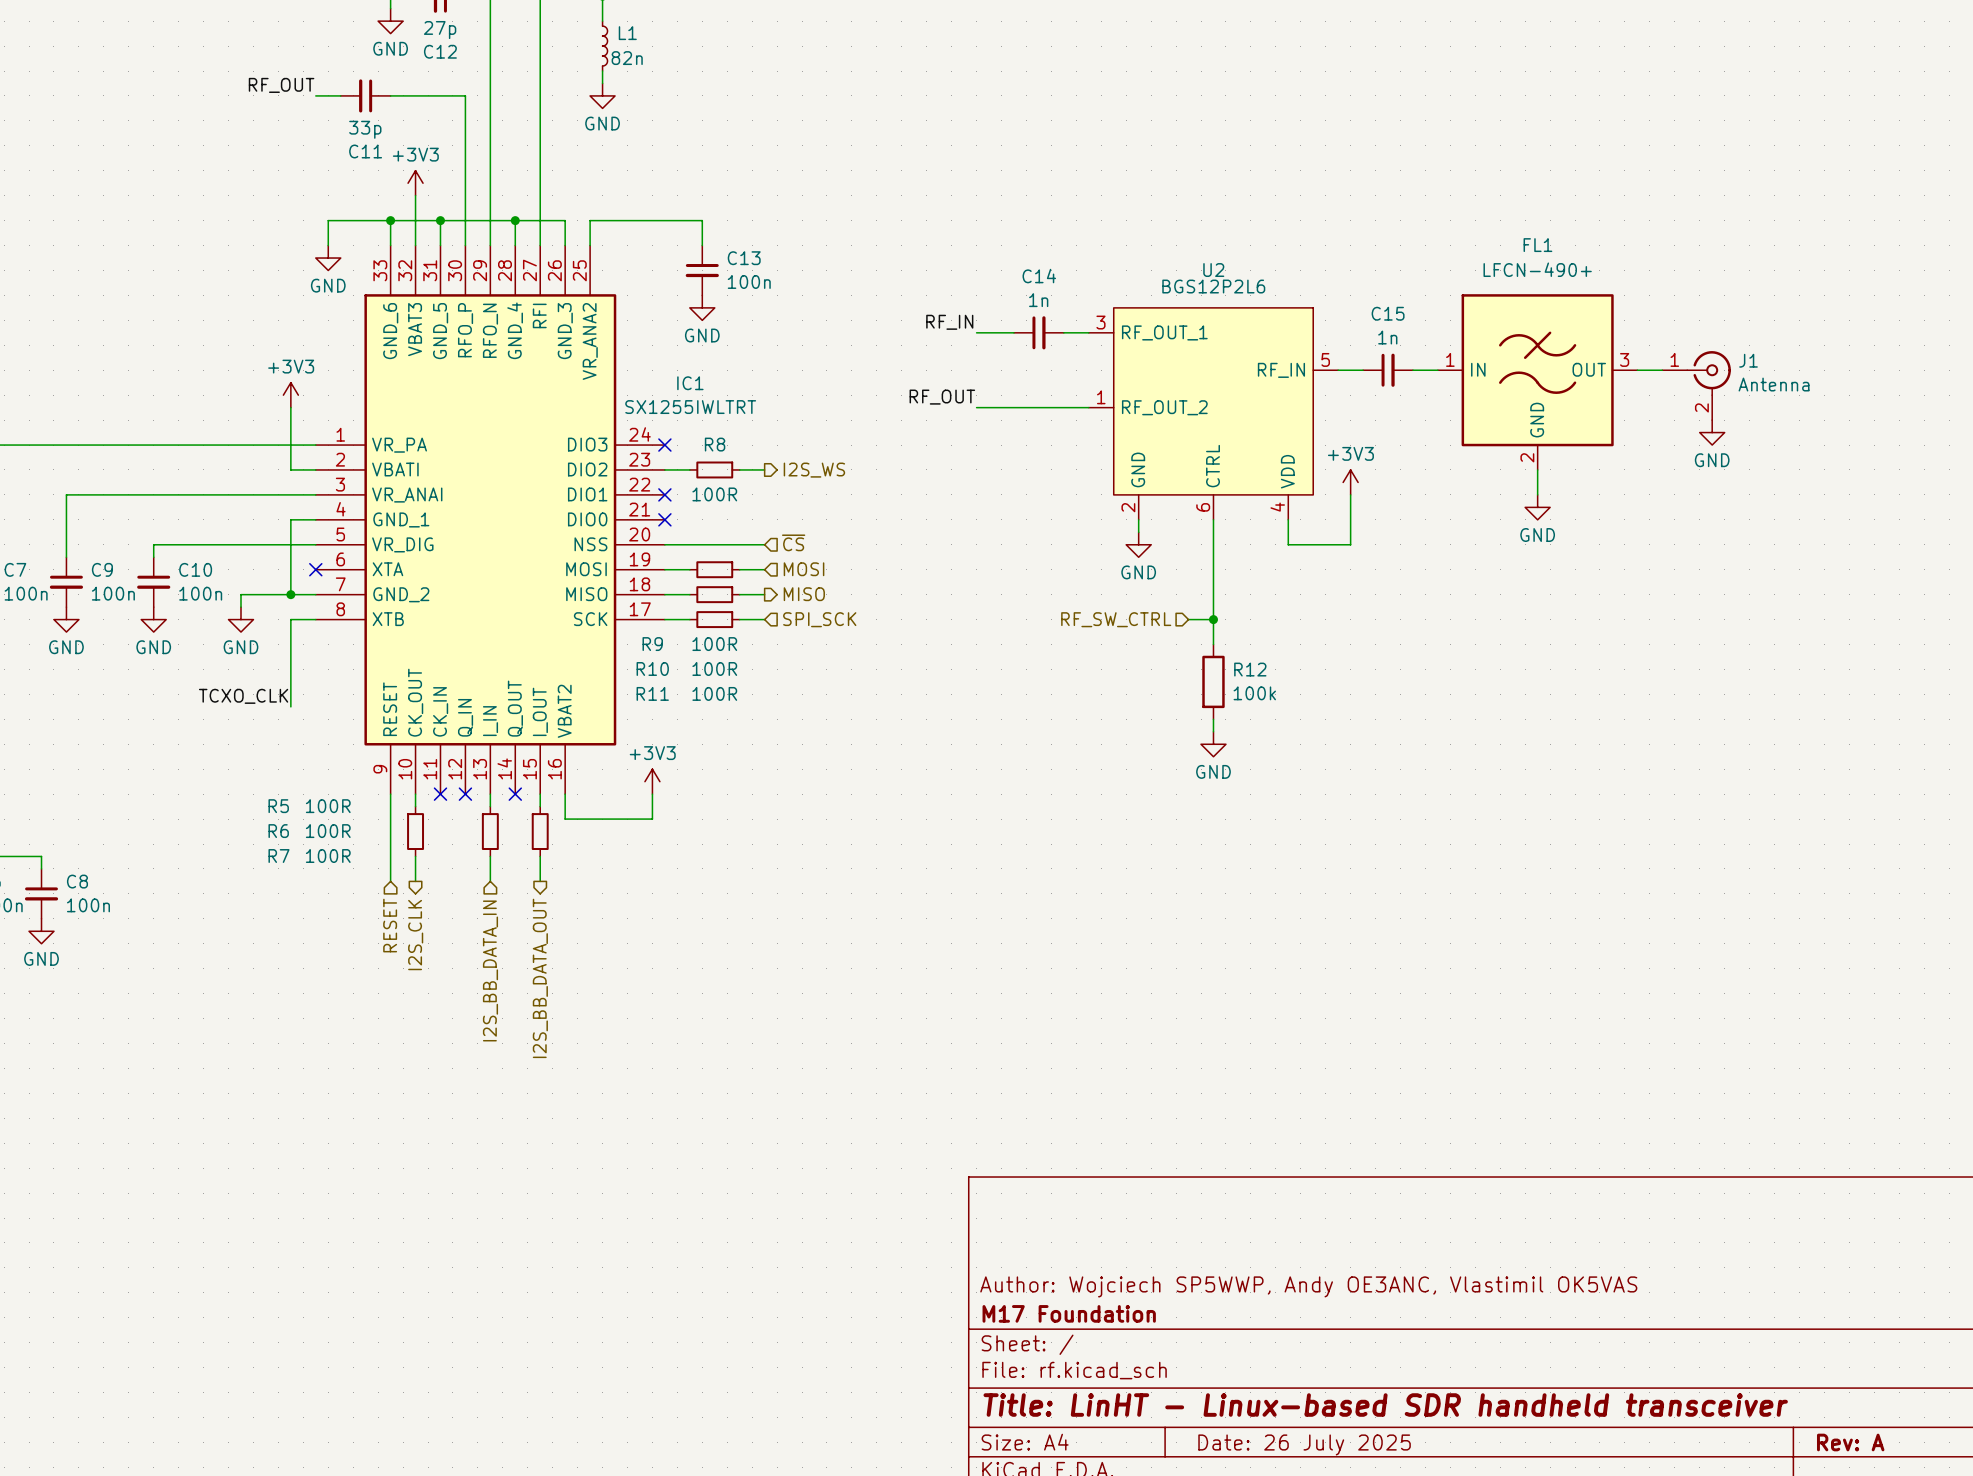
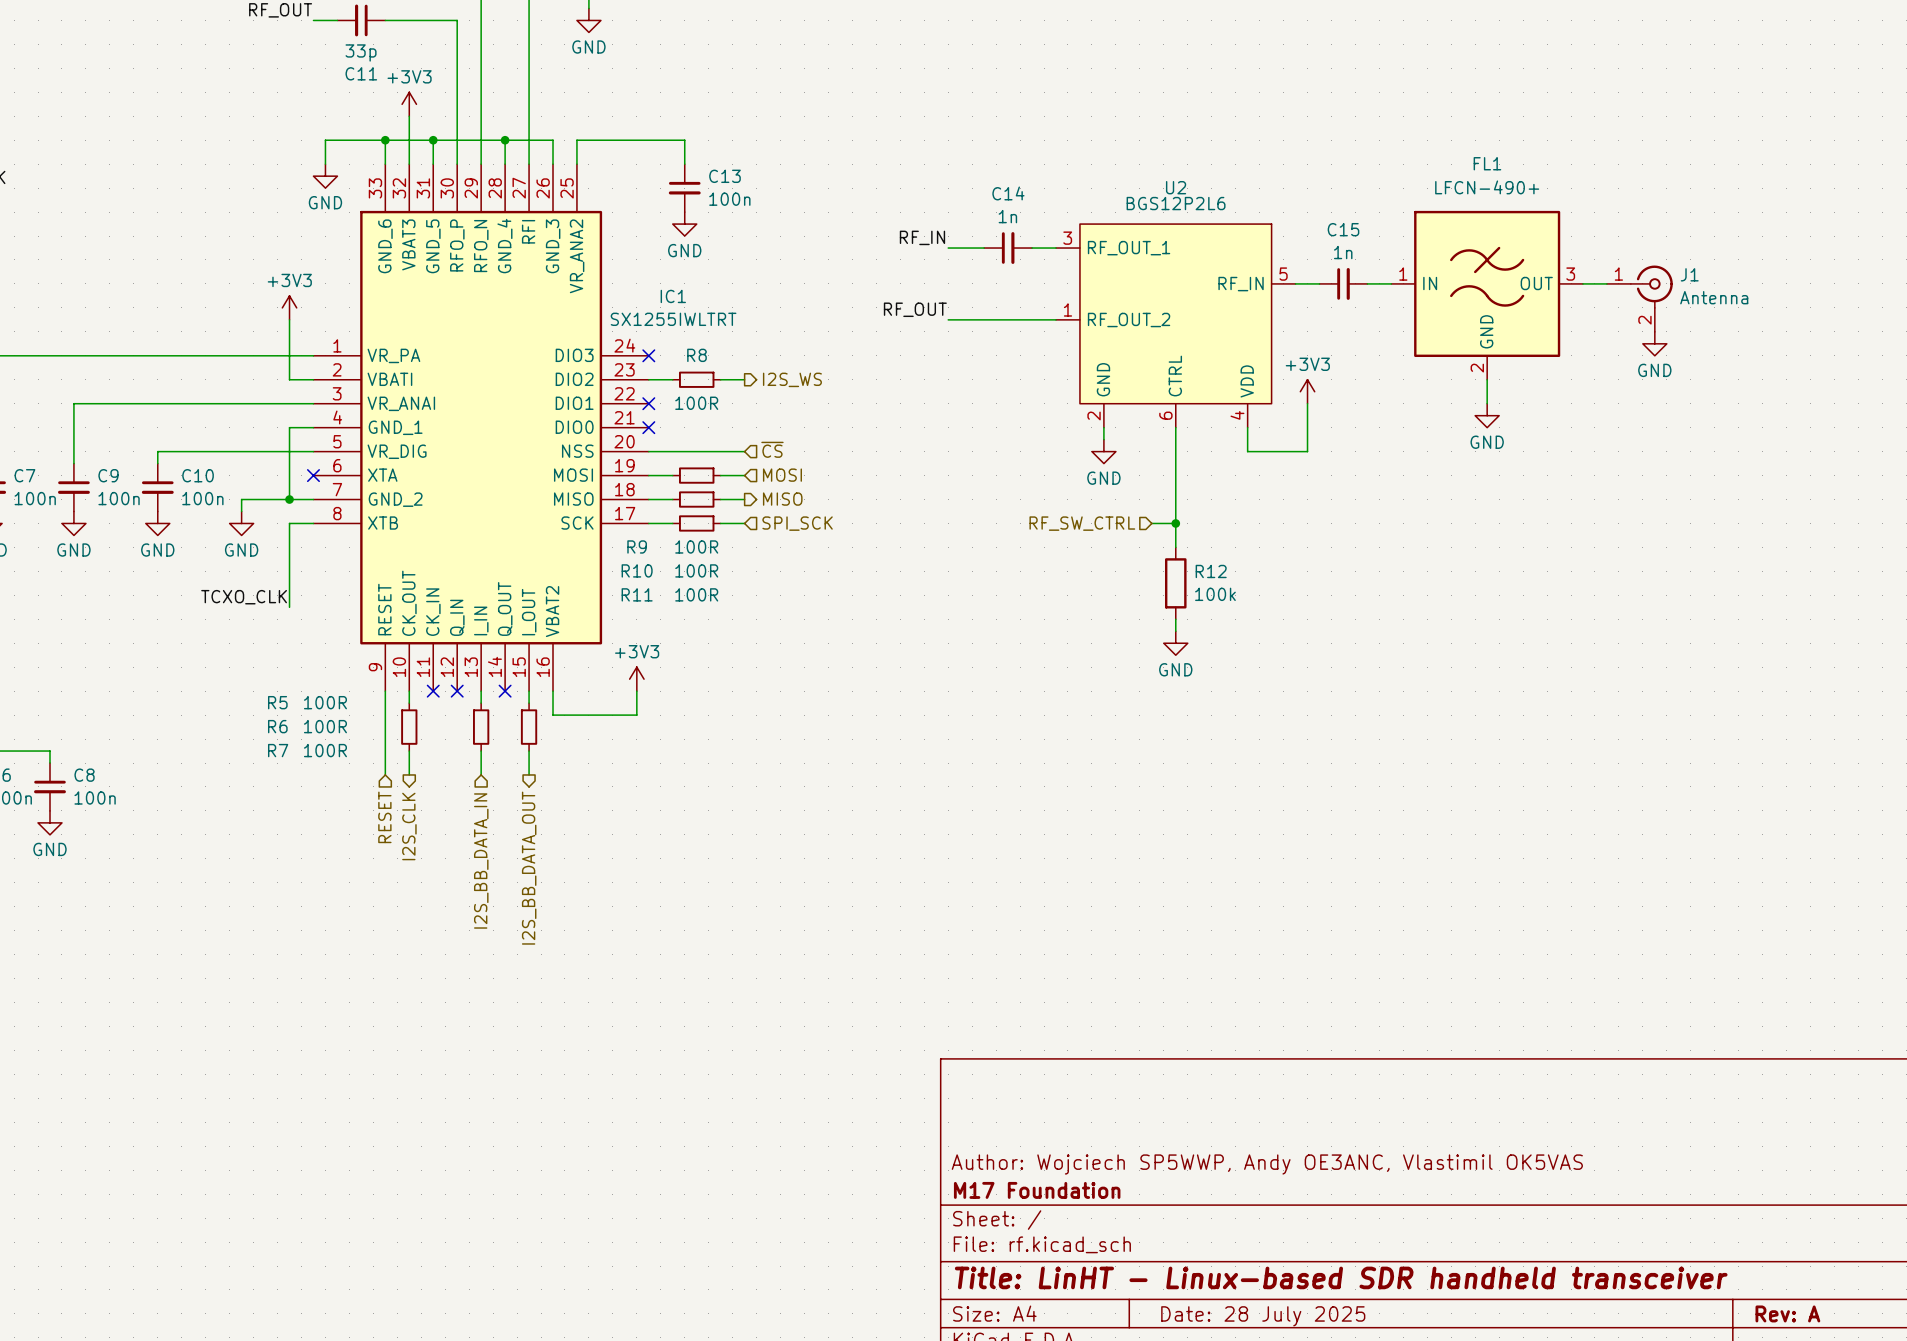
title block: Date: 26 July 2025 (1304, 1444) -> Date: 28 July 2025 (1263, 1316)

